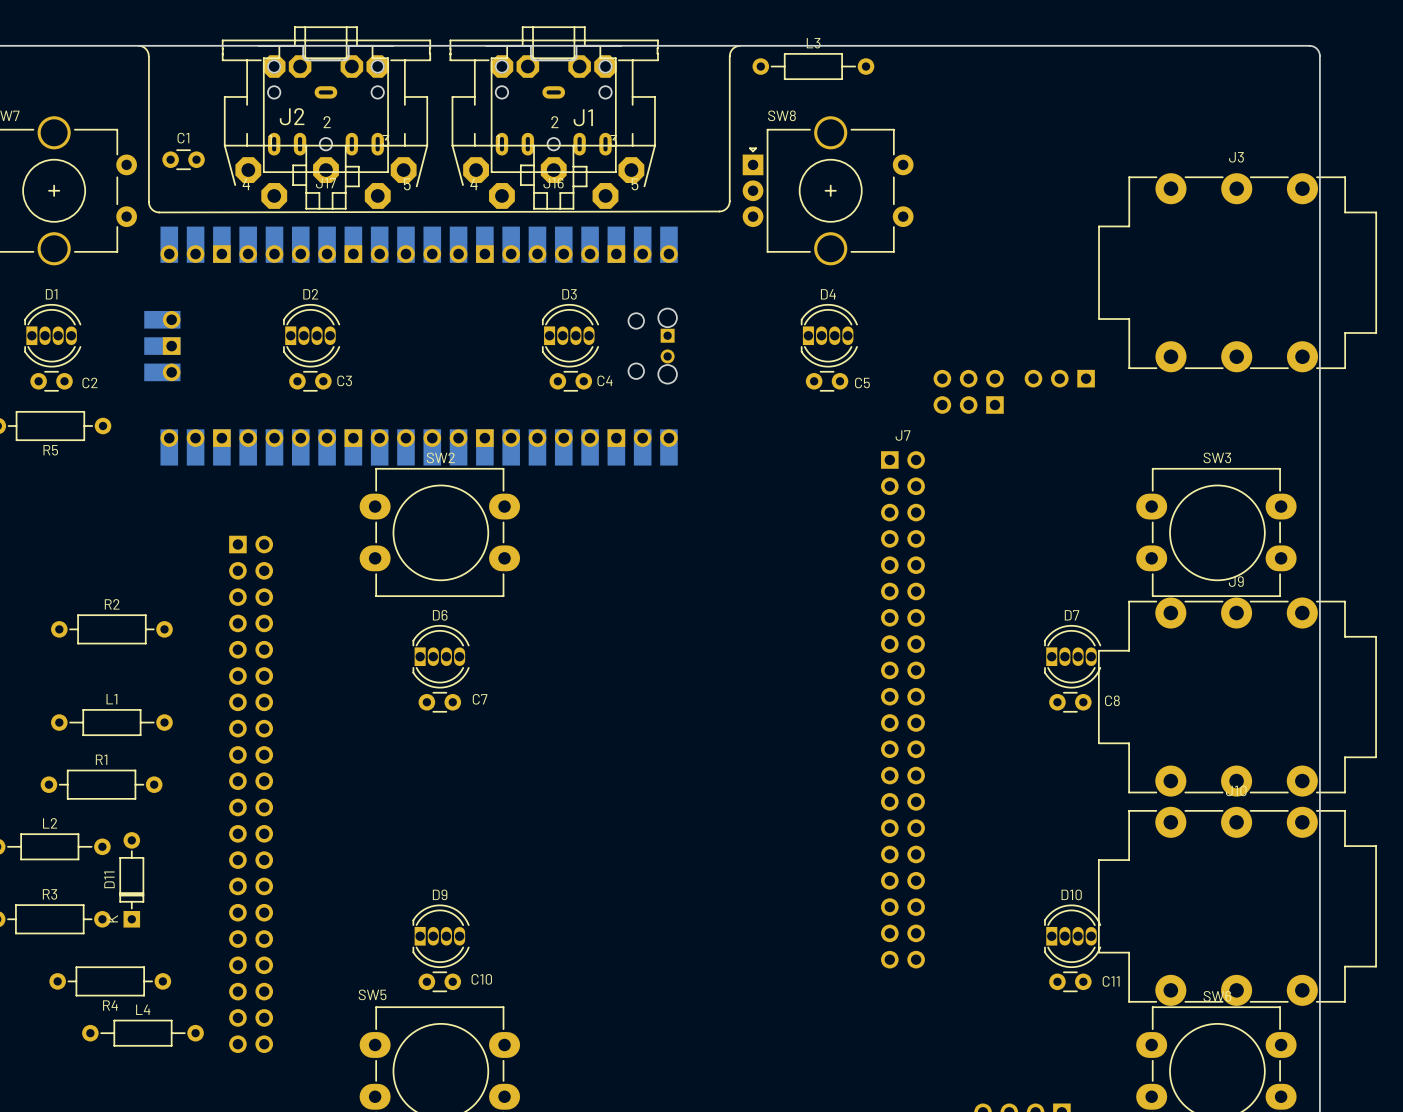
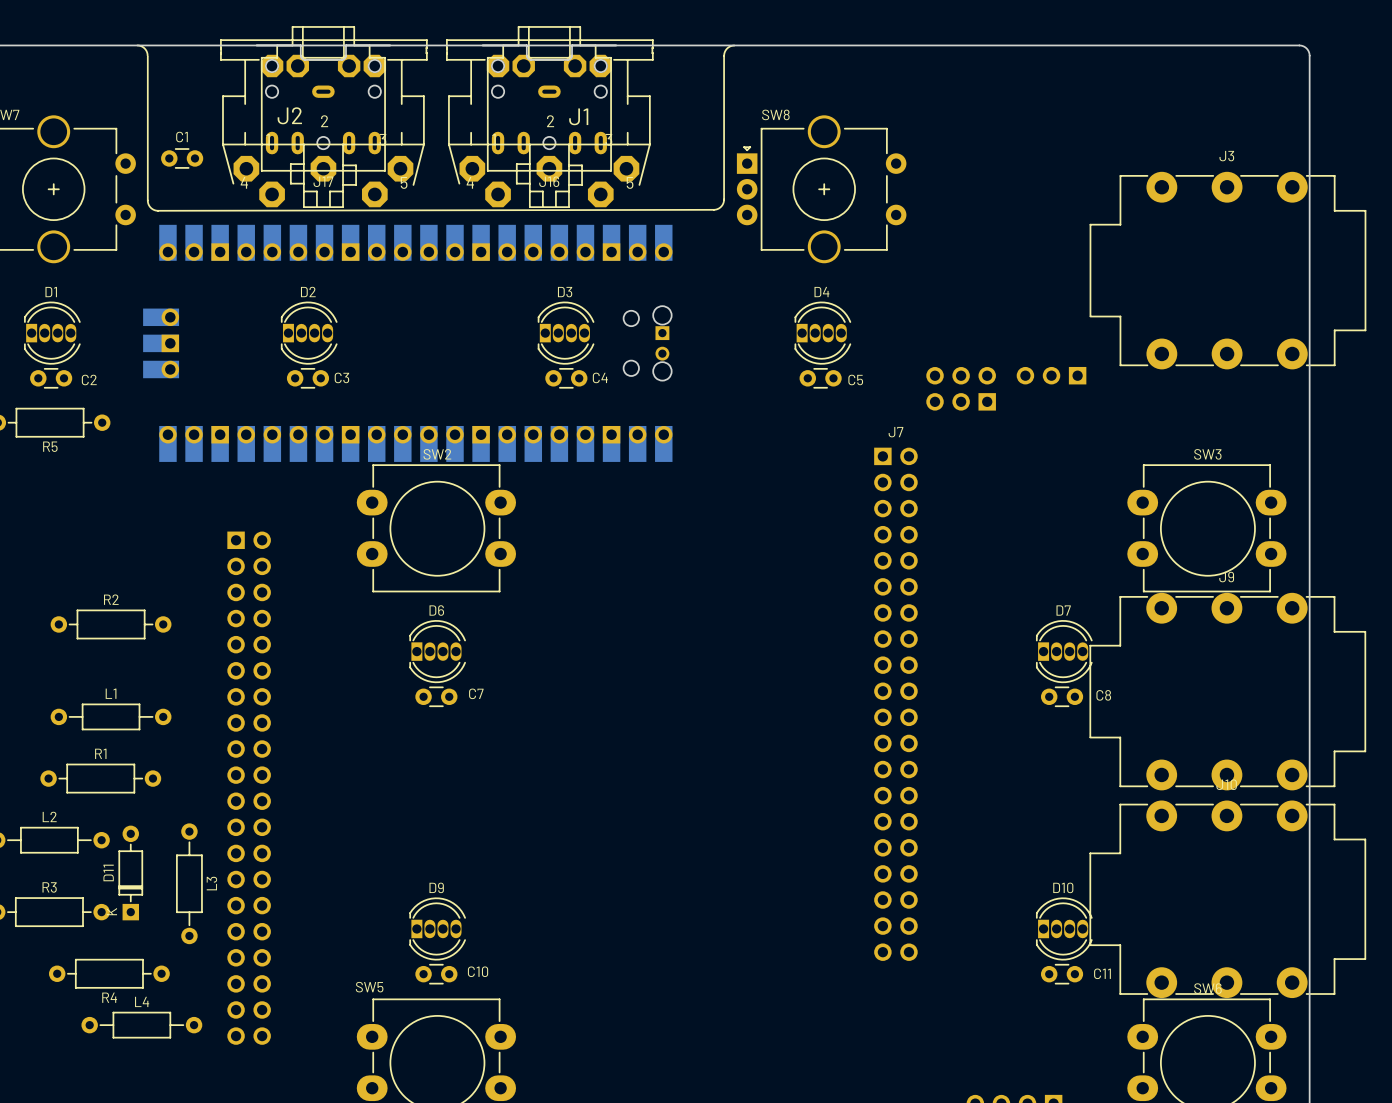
L3 rotation: 0° (813, 66) -> 90° clockwise (189, 883)
L3 position: (813, 66) -> (189, 883)

